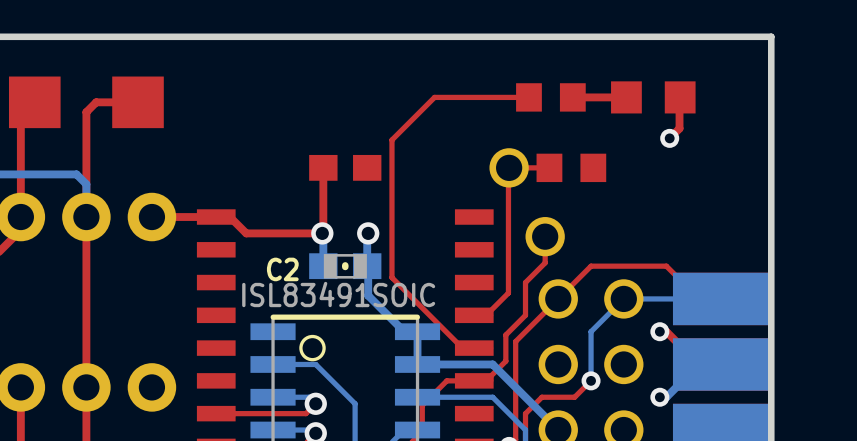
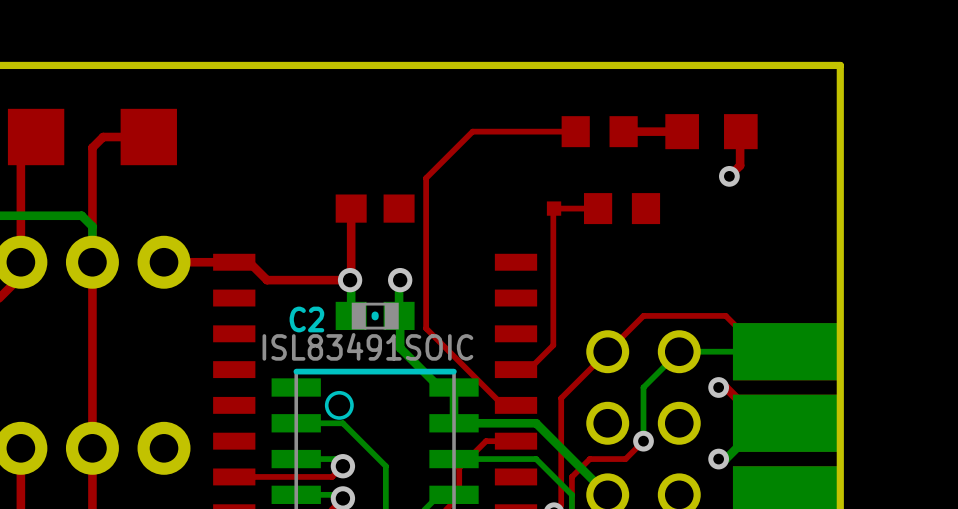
part footprint: [489, 148, 529, 188] -> [546, 201, 562, 216]
top track: (545, 236) (545, 262) (525, 282) (525, 315) (505, 334) (505, 361) (490, 376) (490, 380) -> none
part: (545, 236) -> none

